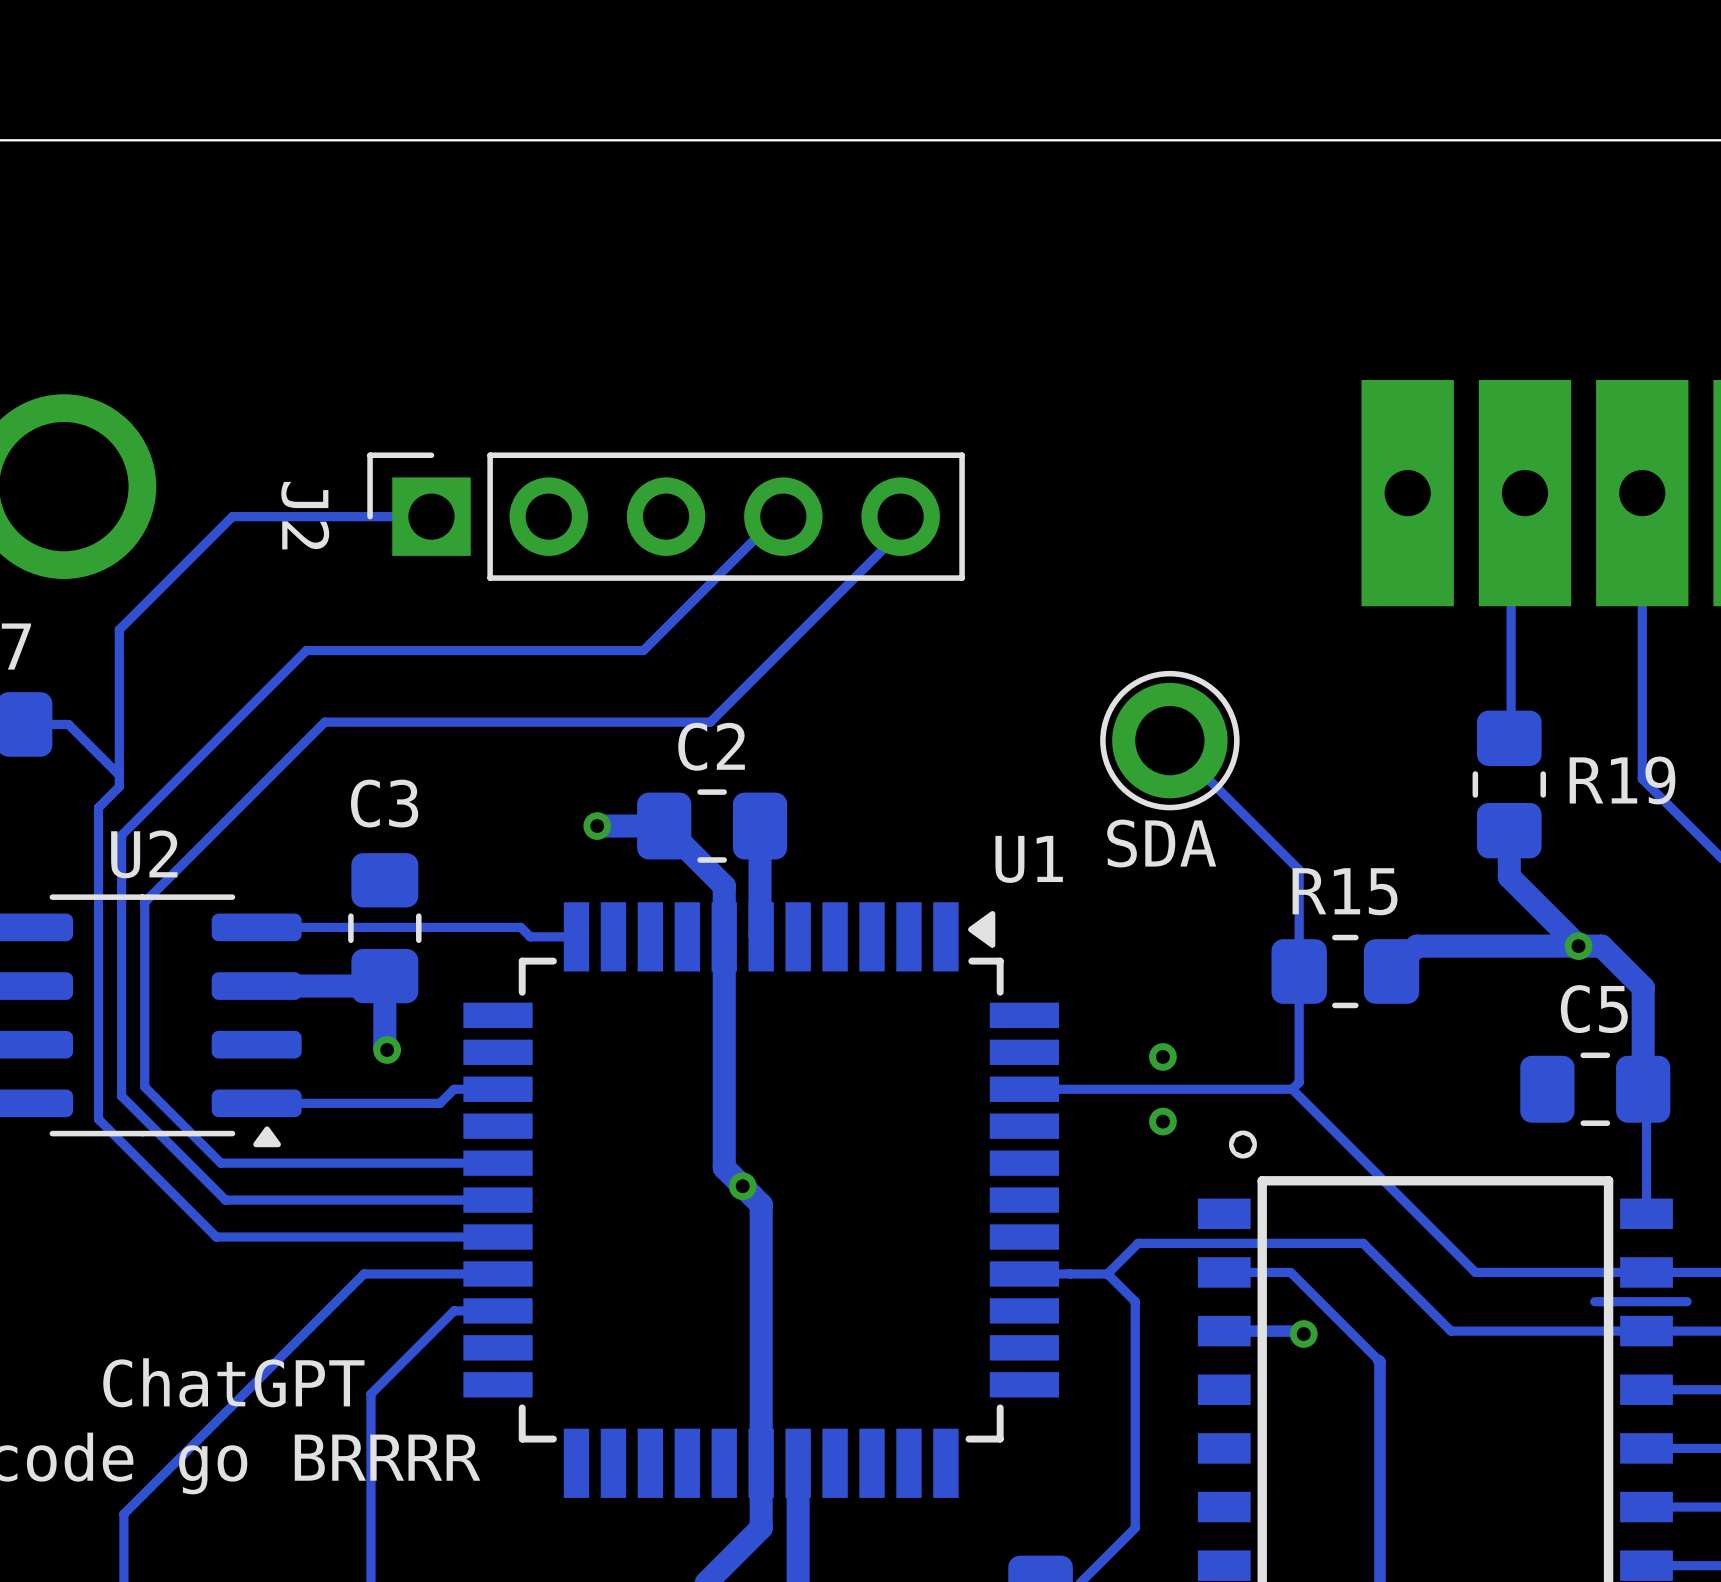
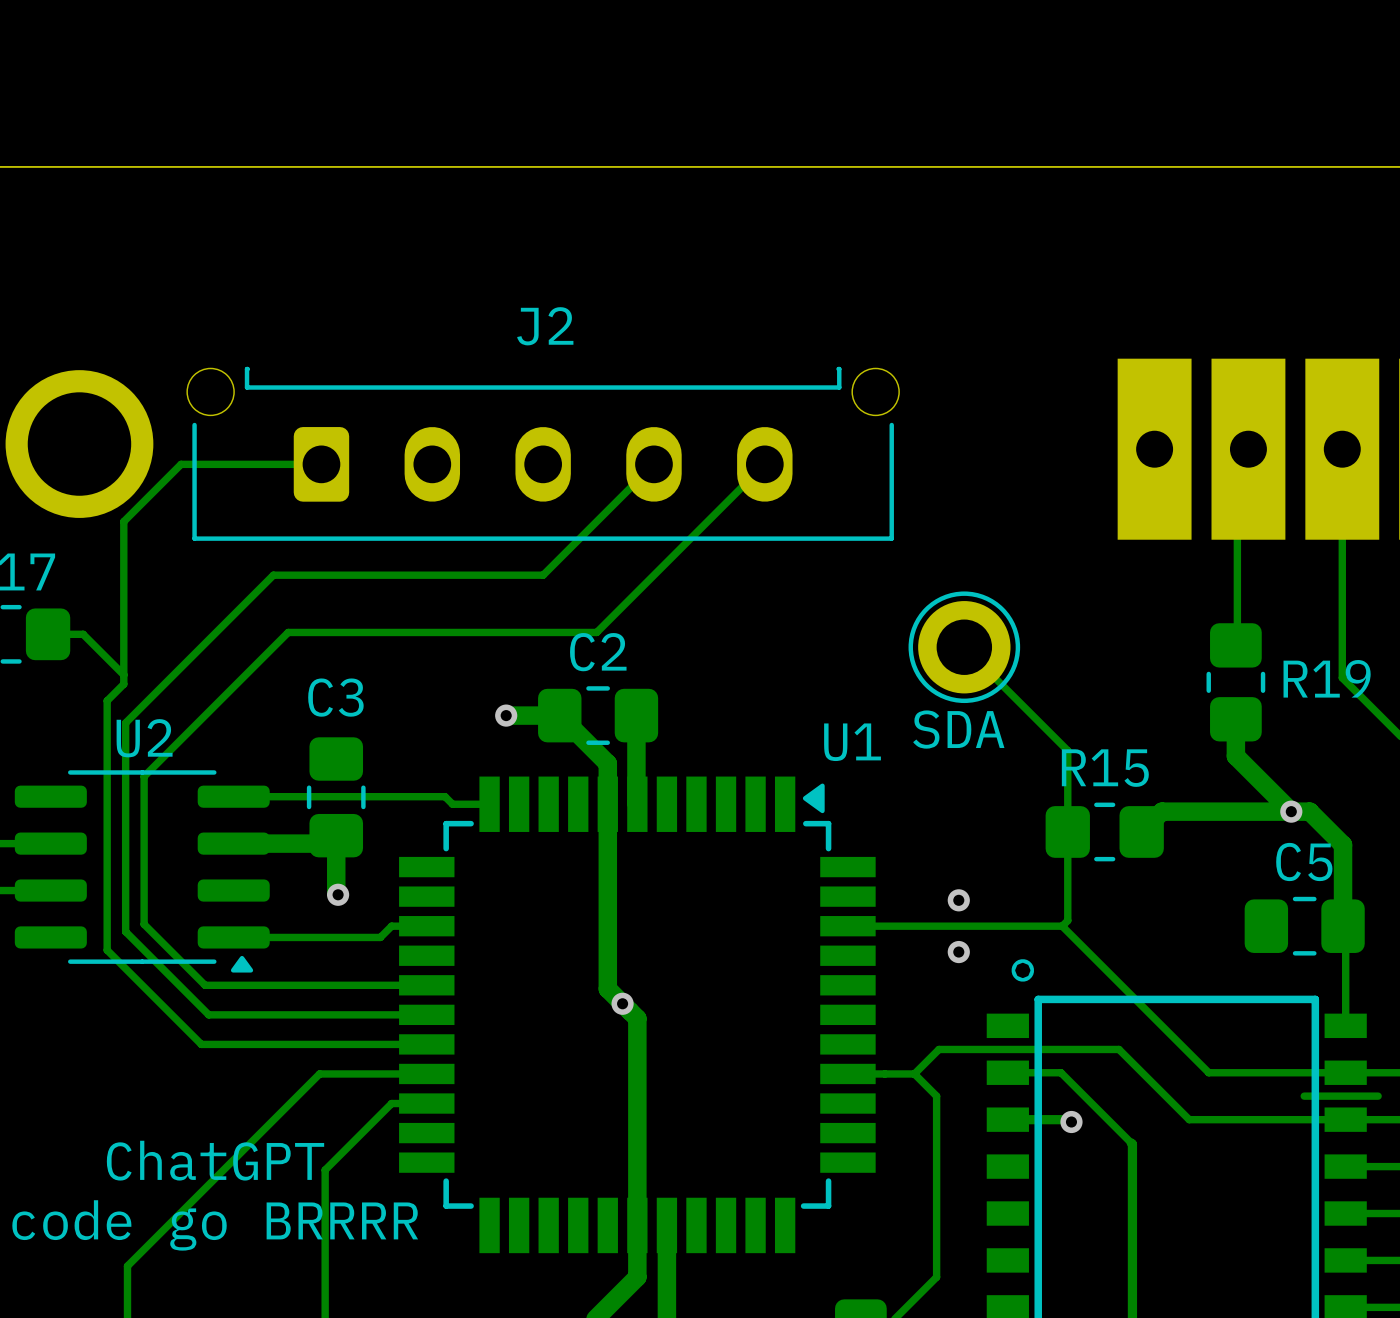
J2 footprint: [367, 452, 965, 581] -> [187, 366, 900, 541]
J2 name position: J2 (305, 515) -> J2 (545, 326)
track: (431, 516) (232, 516) (119, 629) -> (321, 464) (181, 464) (123, 521) (123, 558)

